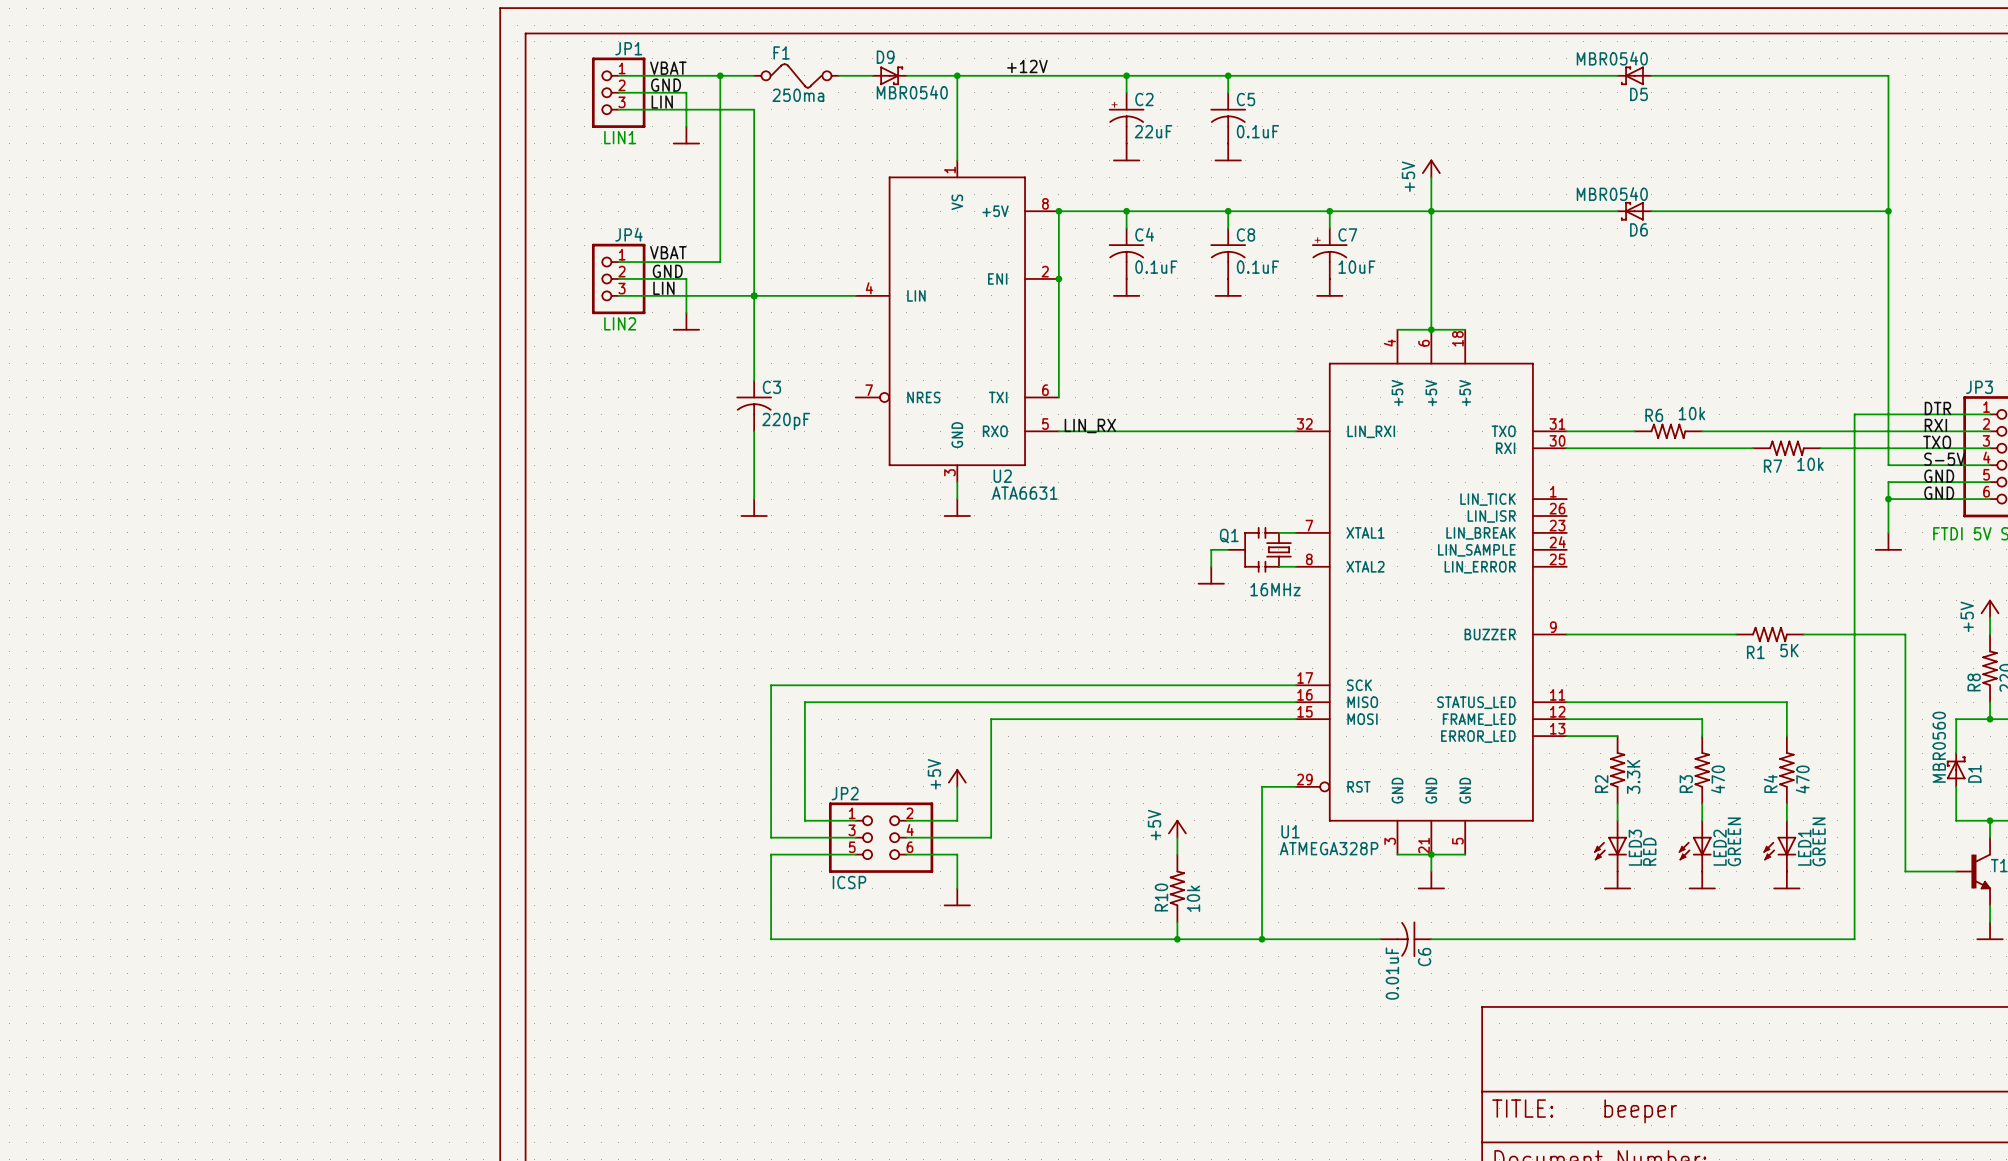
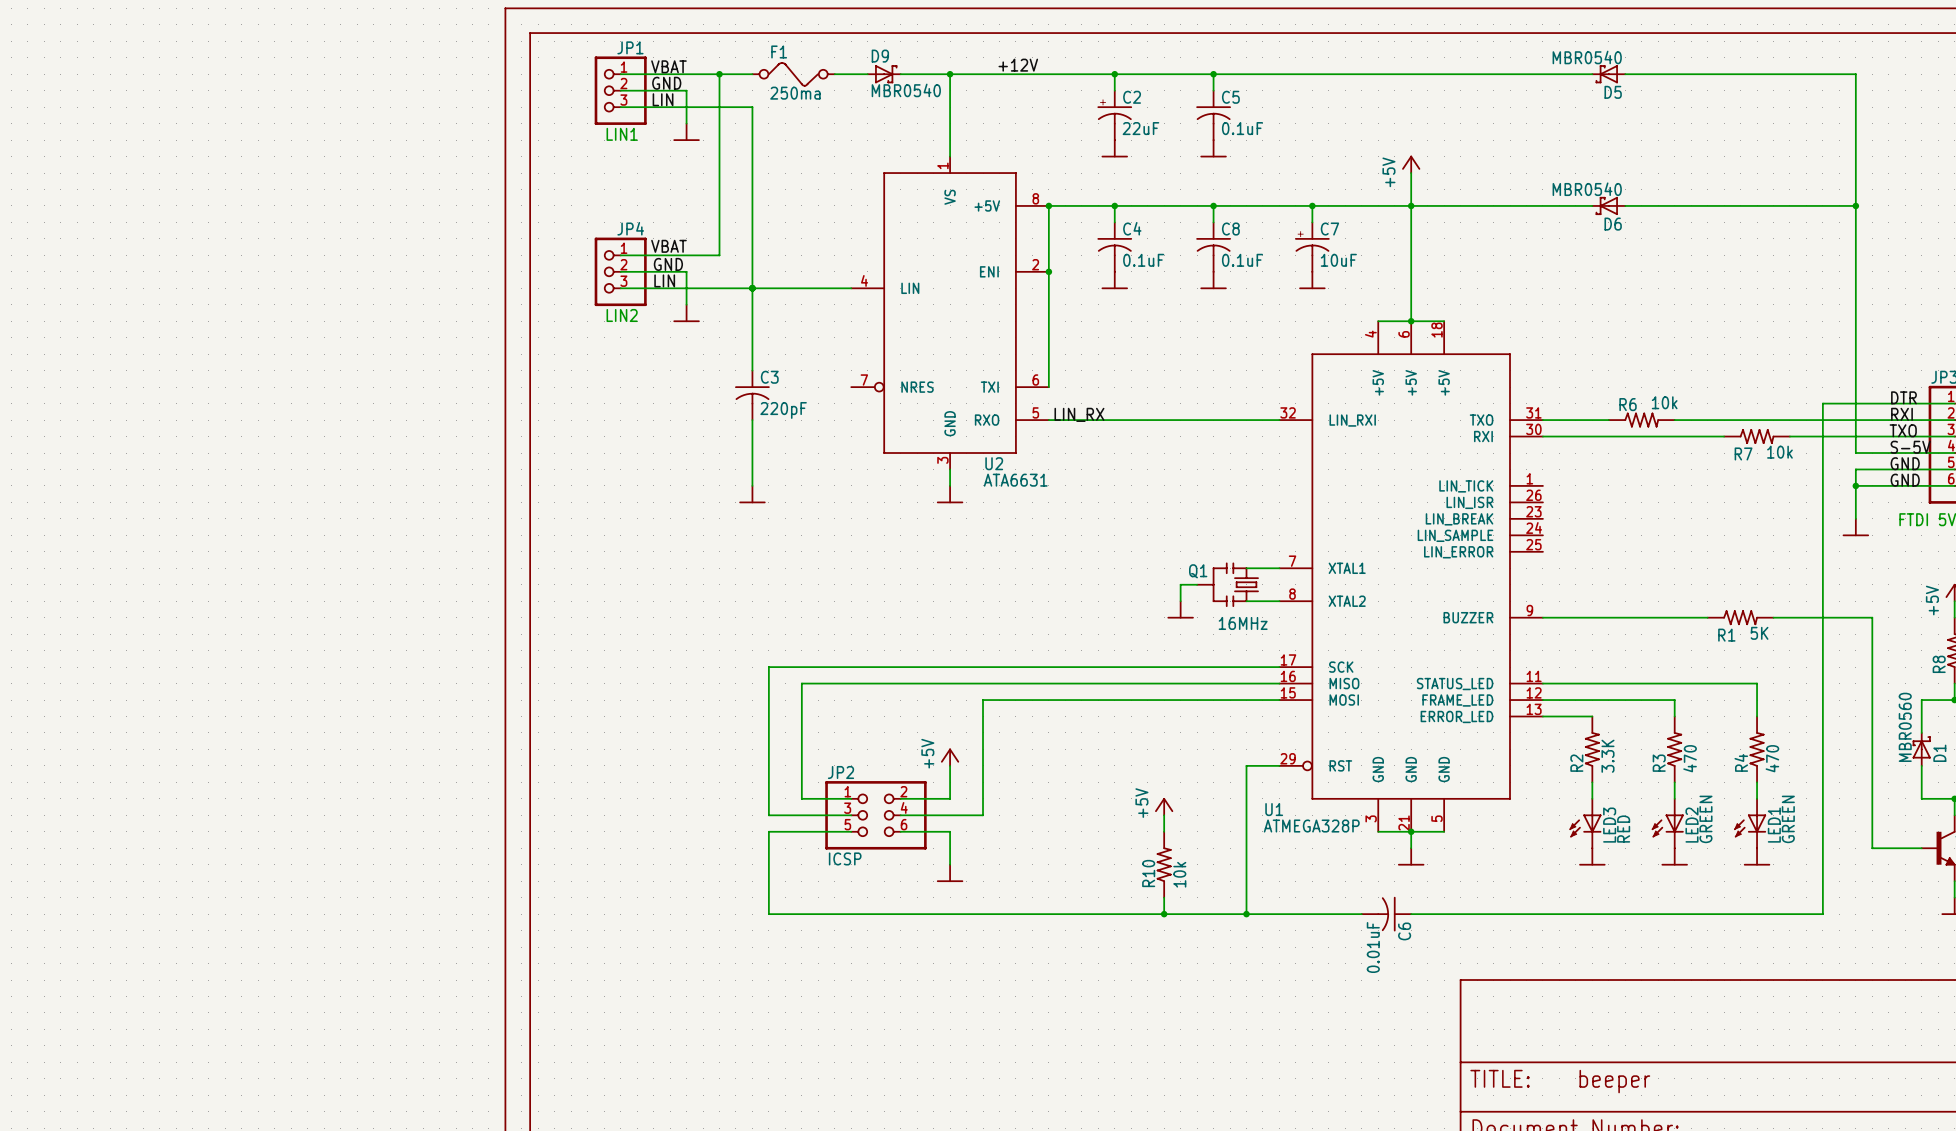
U1 symbol: [1295, 329, 1567, 855] -> [1279, 321, 1543, 832]
wire: (1278, 532) (1295, 532) -> none
wire: (1228, 549) (1211, 549) (1211, 566) -> (1197, 584) (1180, 584) (1180, 601)
Q1 position: (1259, 549) -> (1227, 584)
wire: (1278, 566) (1295, 566) -> none
power symbol position: (1211, 575) -> (1180, 609)
wire: none -> (1246, 568) (1279, 568)
wire: none -> (1246, 601) (1279, 601)

